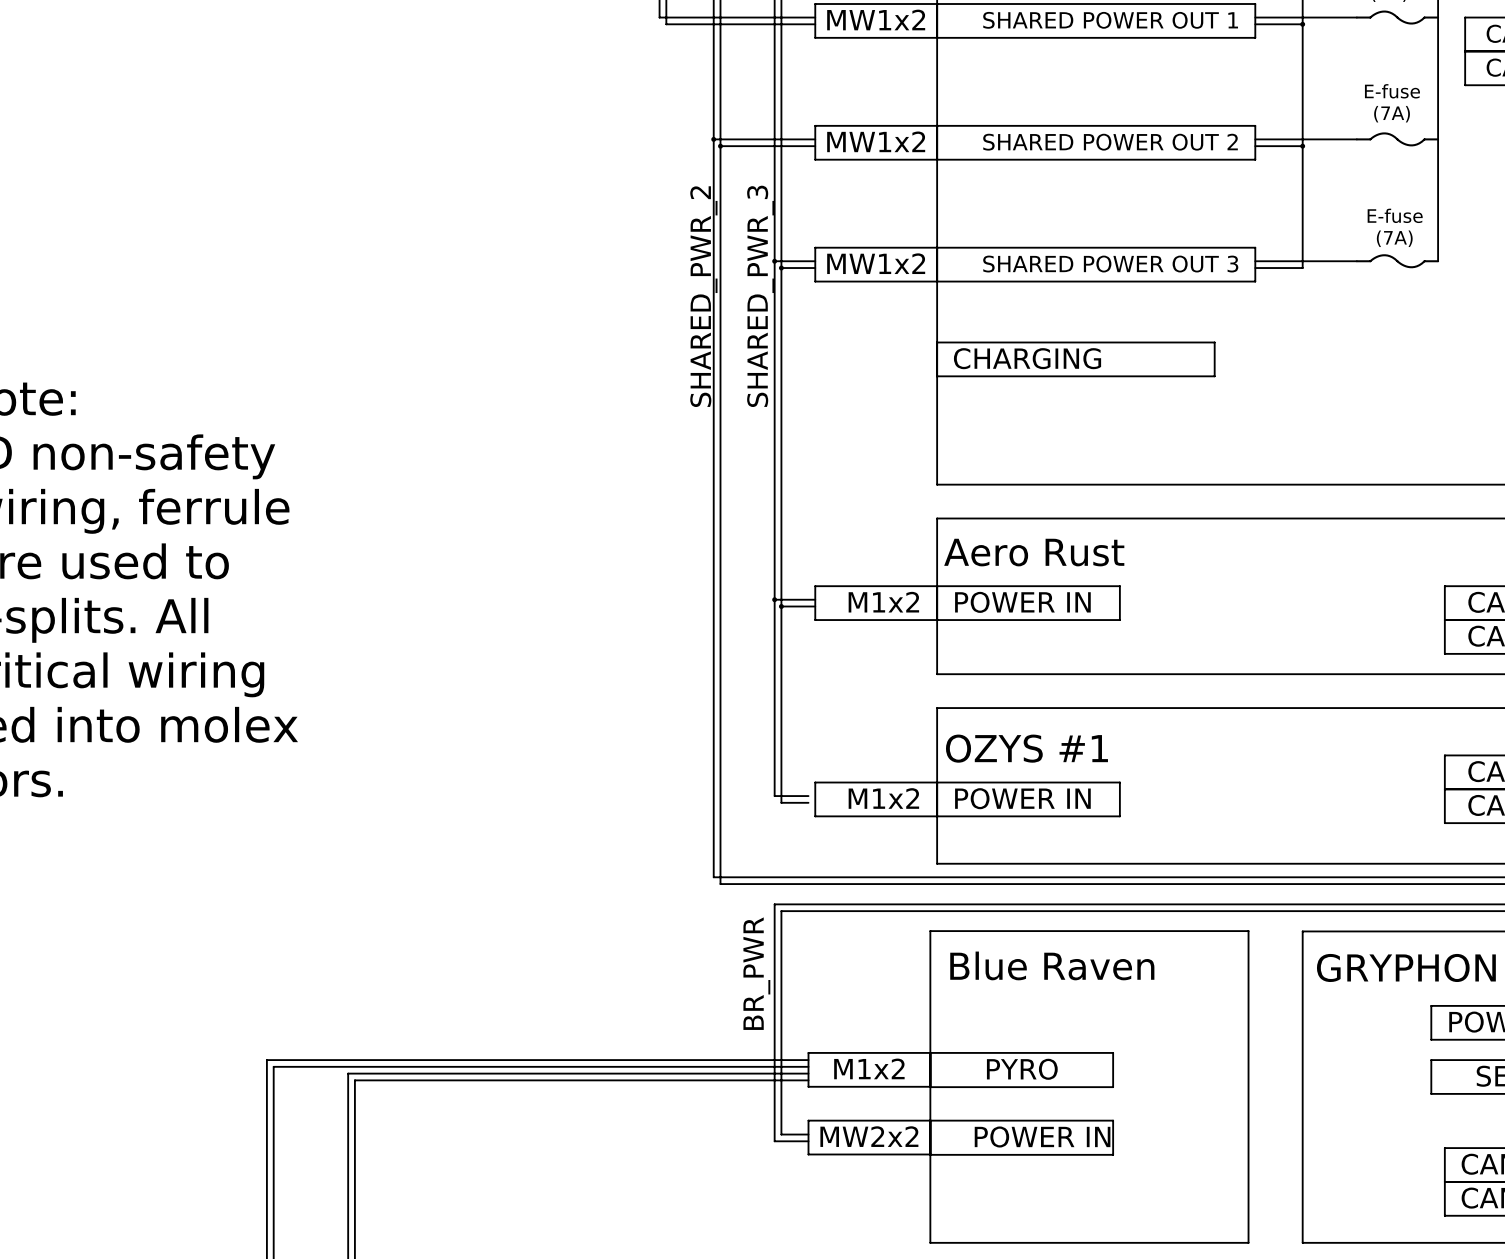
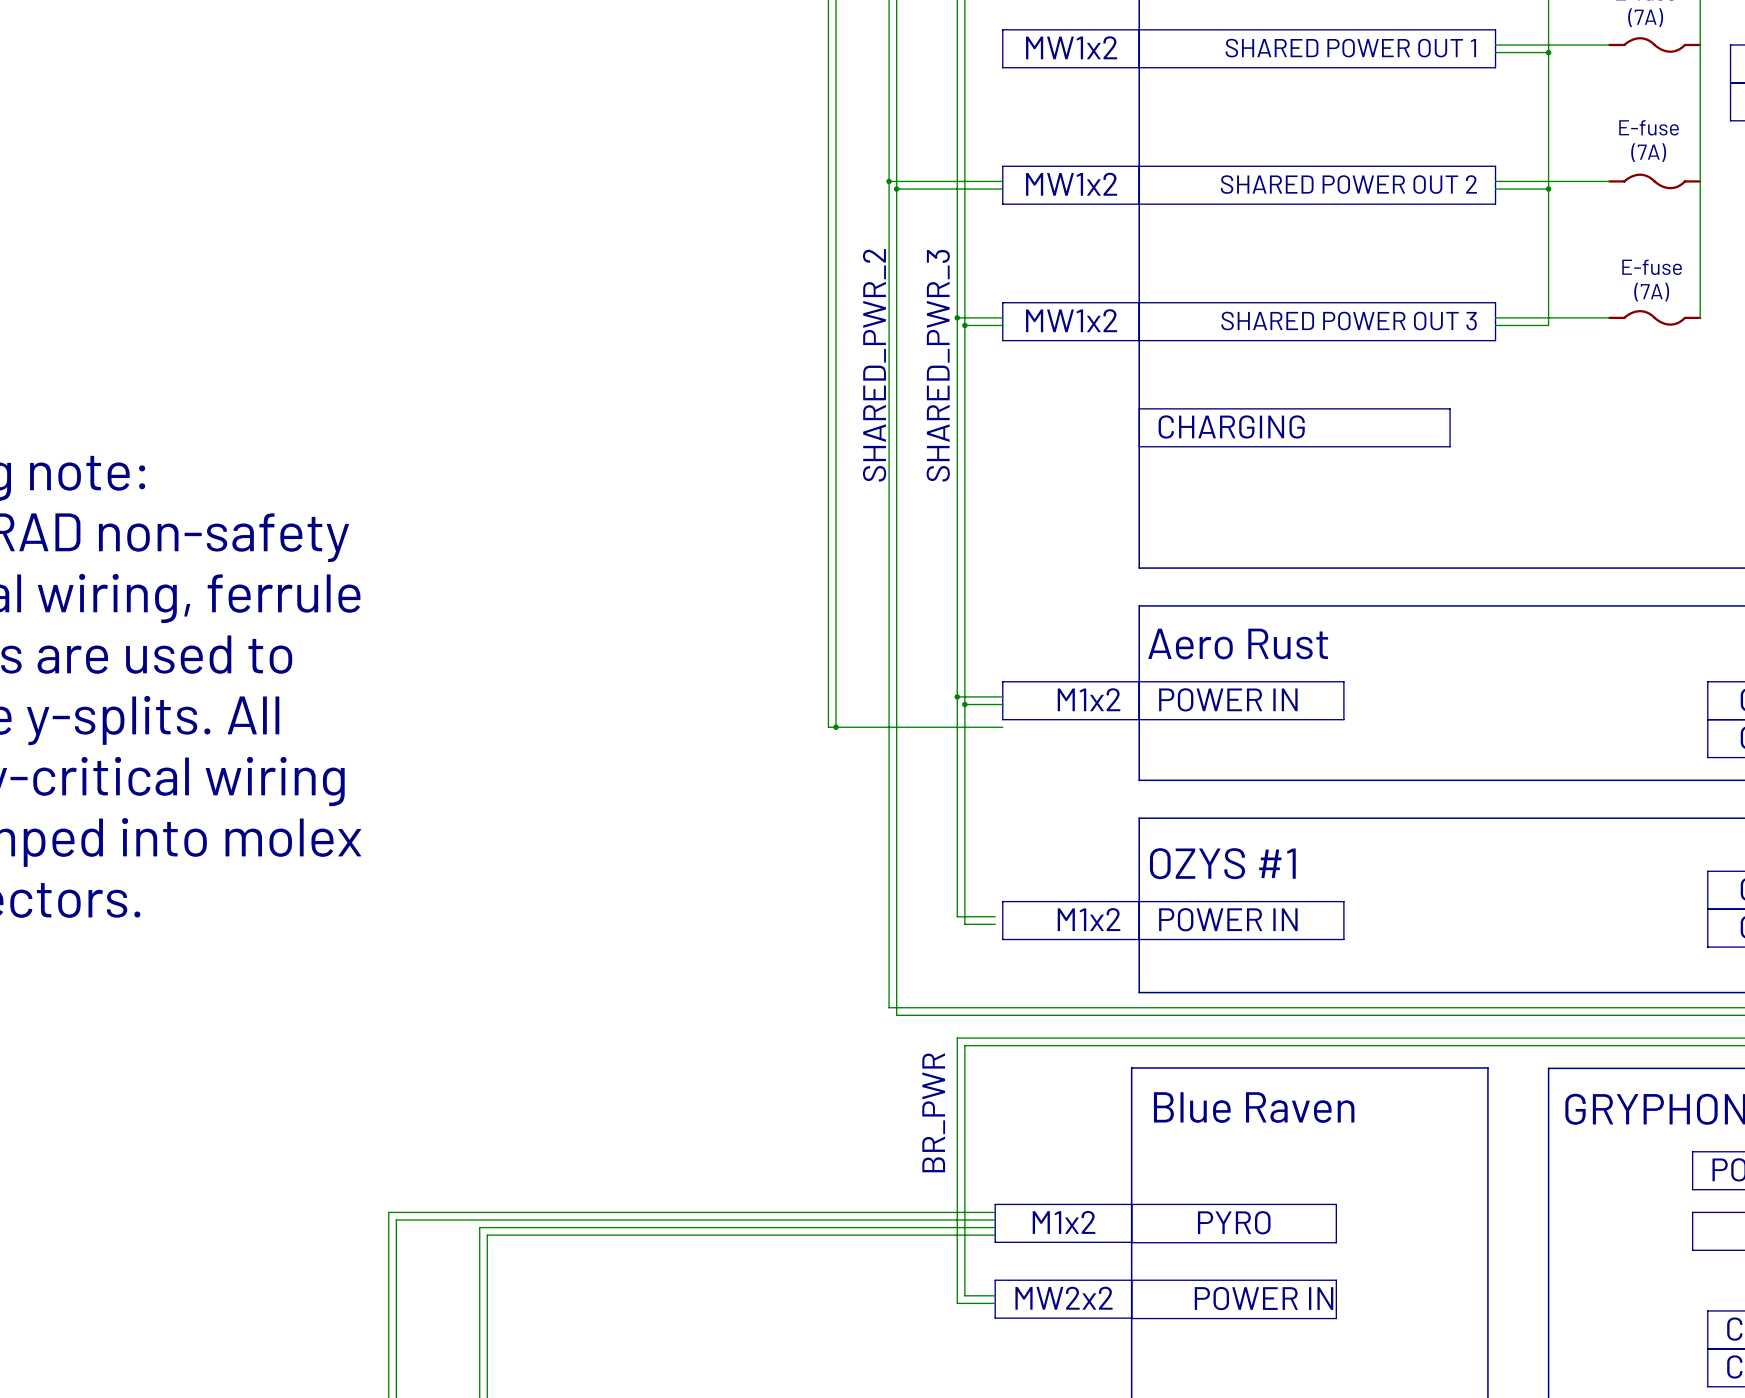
wire: (659, 17) (815, 17) -> (828, 44) (828, 727) (1002, 727)
wire: (666, 24) (815, 24) -> (836, 52) (836, 727)
junction: none -> (836, 727)

